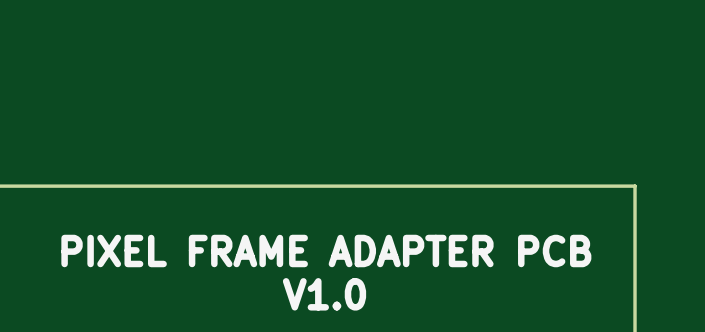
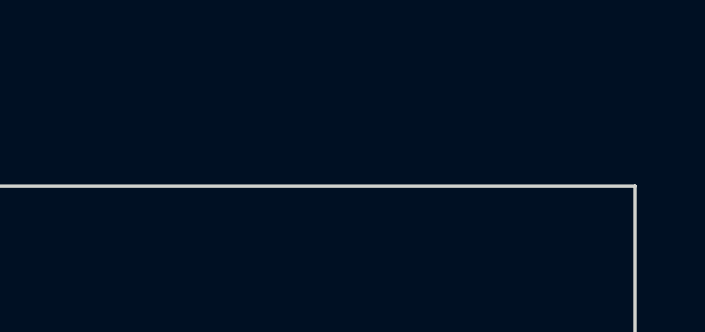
text: PIXEL FRAME ADAPTER PCB (326, 250) -> none
text: V1.0 (324, 294) -> none

